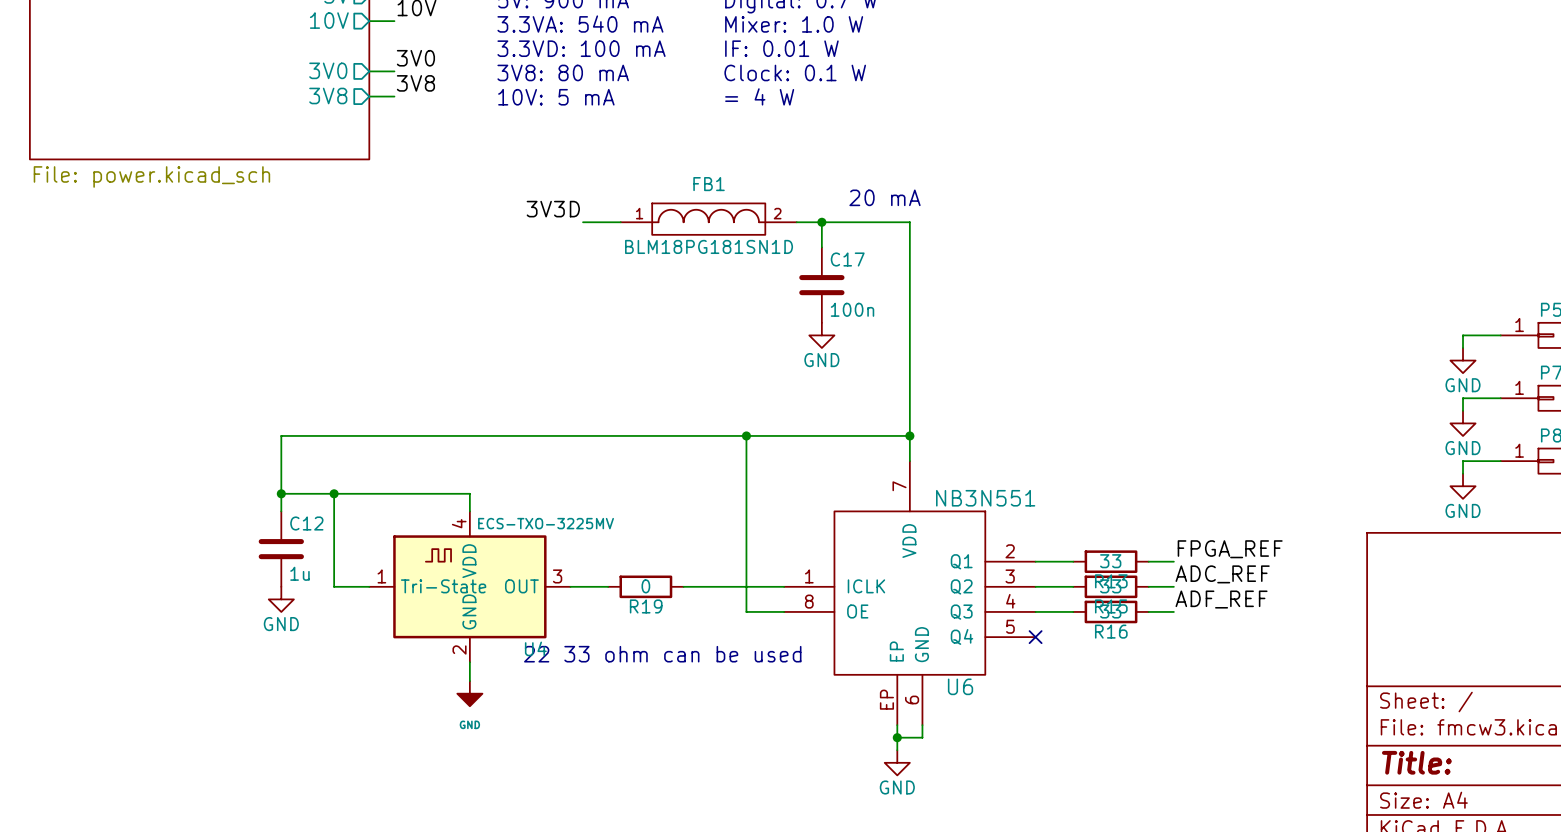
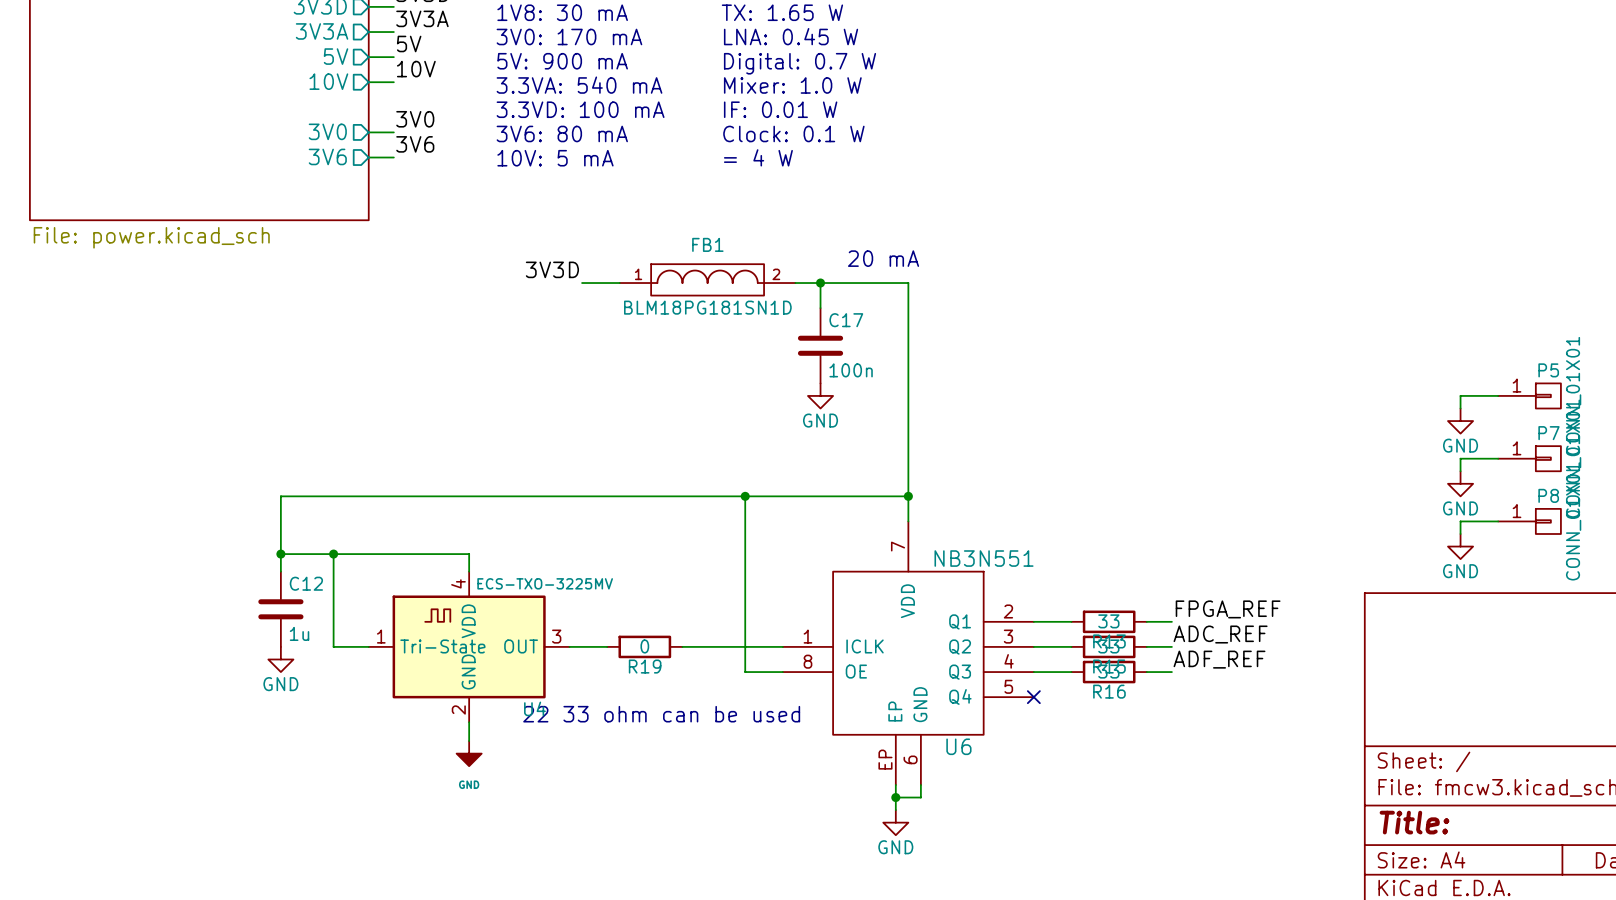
text: 3V8: 80 mA (563, 72) -> 3V6: 80 mA (562, 133)
label: 3V8 (415, 83) -> 3V6 (415, 144)
sheet pin: 3V8 (328, 95) -> 3V6 (327, 156)

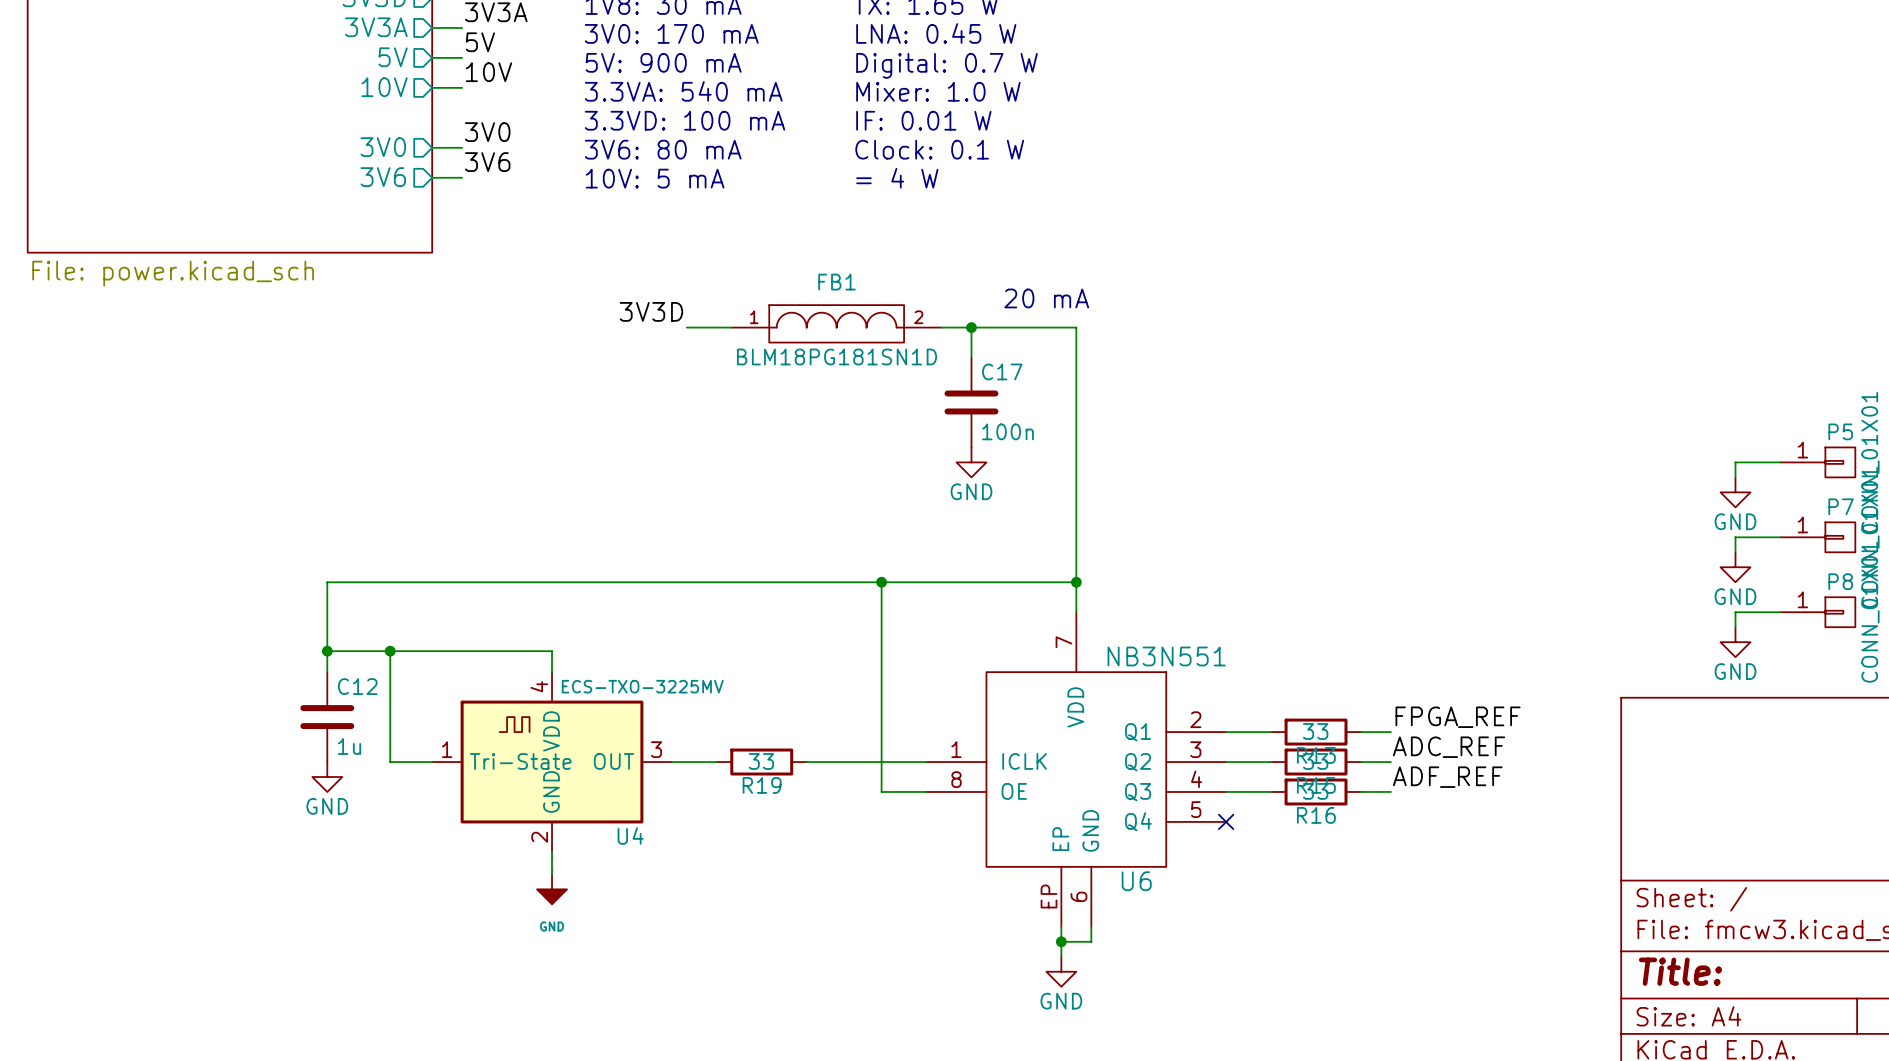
R19 value: 0 (644, 646) -> 33 (761, 761)
text: 22 33 ohm can be used (661, 714) -> none

